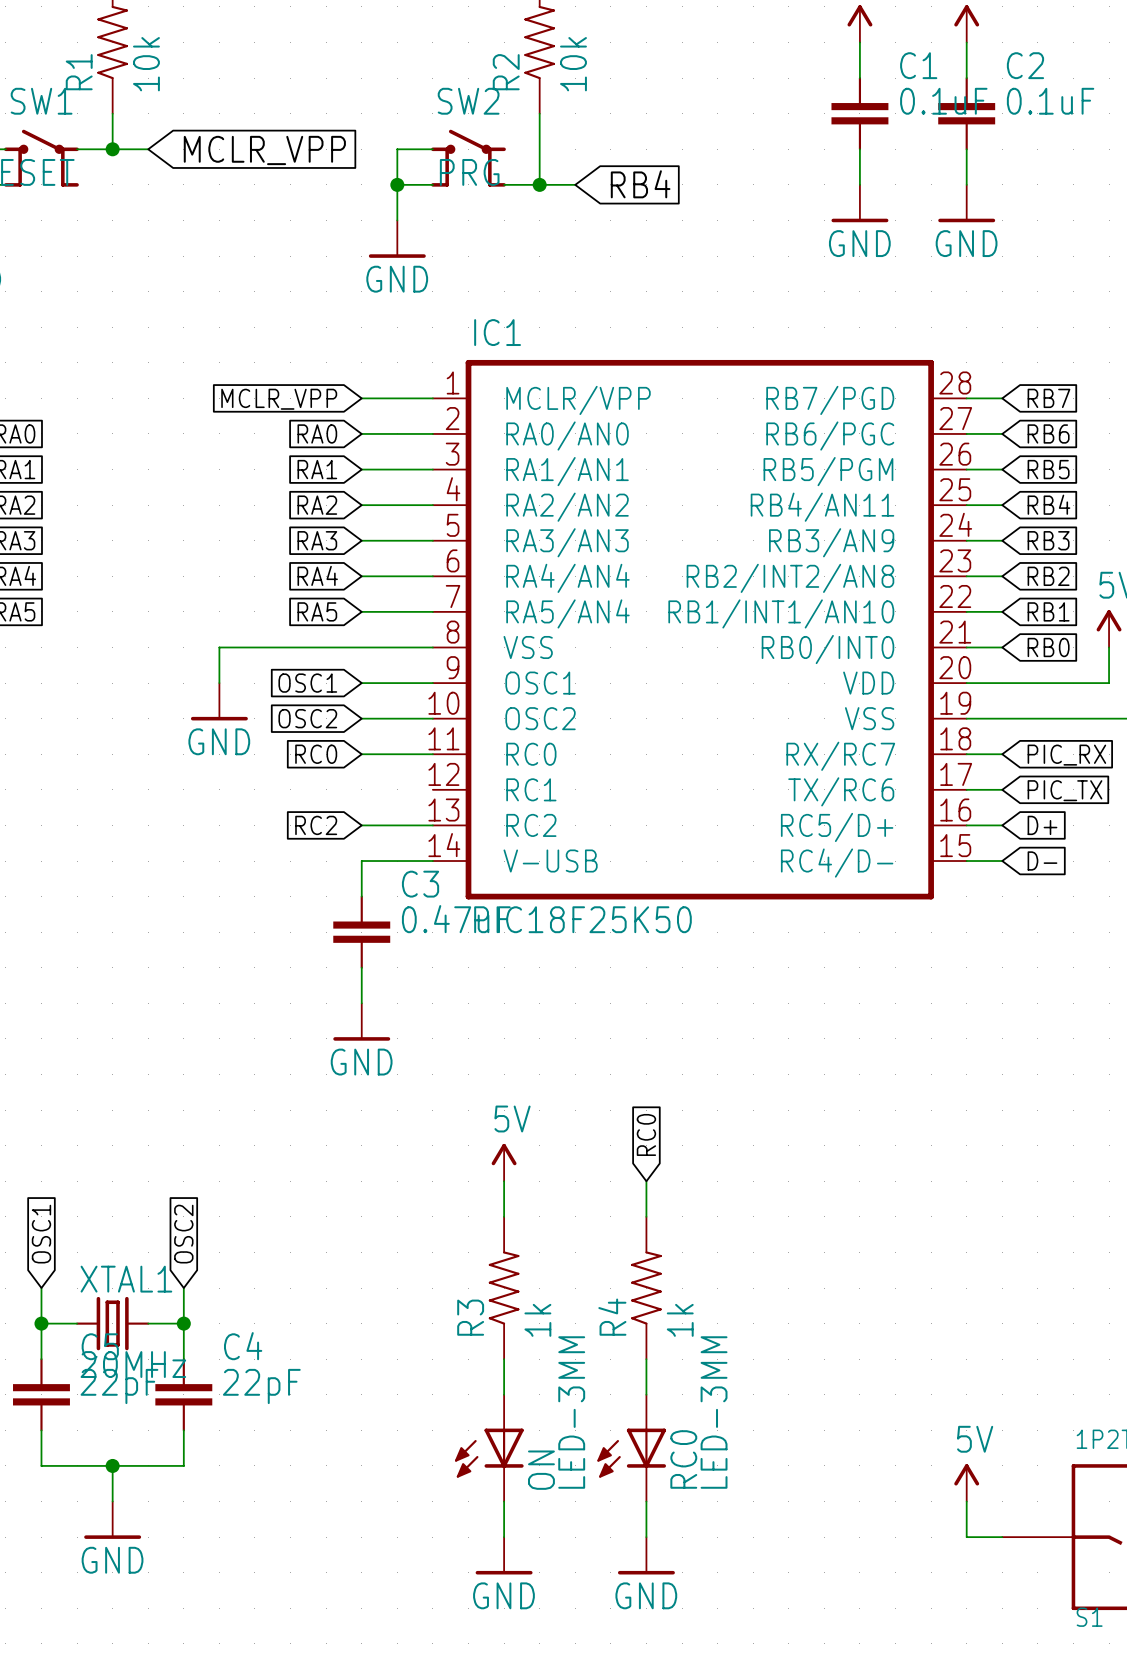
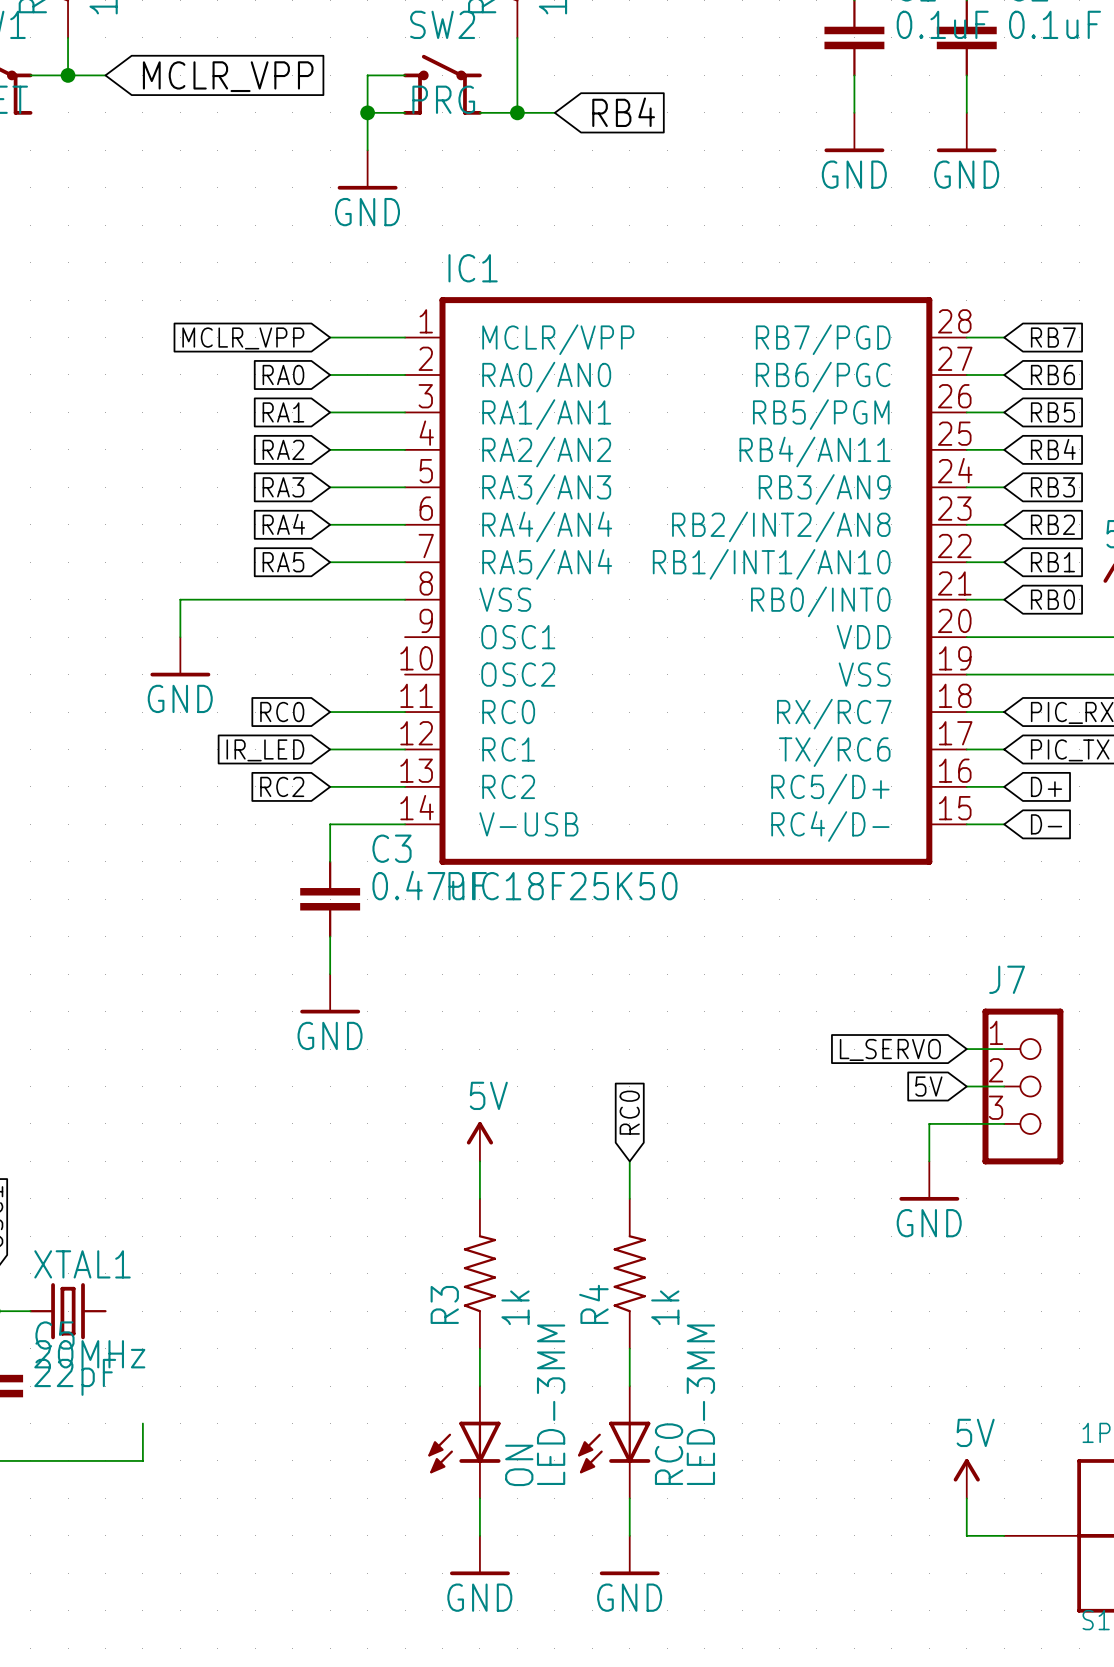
global label: OSC1 (307, 683) -> none
wire: (361, 683) (432, 683) -> none
global label: OSC2 (307, 718) -> none
wire: (361, 718) (432, 718) -> (330, 749) (405, 749)
global label: none -> IR_LED (265, 750)
wire: none -> (966, 1049) (1004, 1049)
global label: none -> L_SERVO (890, 1049)
global label: none -> 5V (928, 1086)
wire: none -> (966, 1086) (1004, 1086)
J7: none -> (1022, 1086)
wire: none -> (1004, 1123) (929, 1123) (929, 1161)
power symbol: none -> GND (929, 1181)
global label: OSC2 (183, 1234) -> none
wire: (183, 1288) (183, 1359) -> none
wire: (148, 1323) (183, 1323) -> none
junction: (183, 1323) -> none
C4: 22pF (183, 1394) -> none
wire: (112, 1465) (112, 1501) -> none
junction: (112, 1465) -> none
power symbol: GND (112, 1520) -> none

